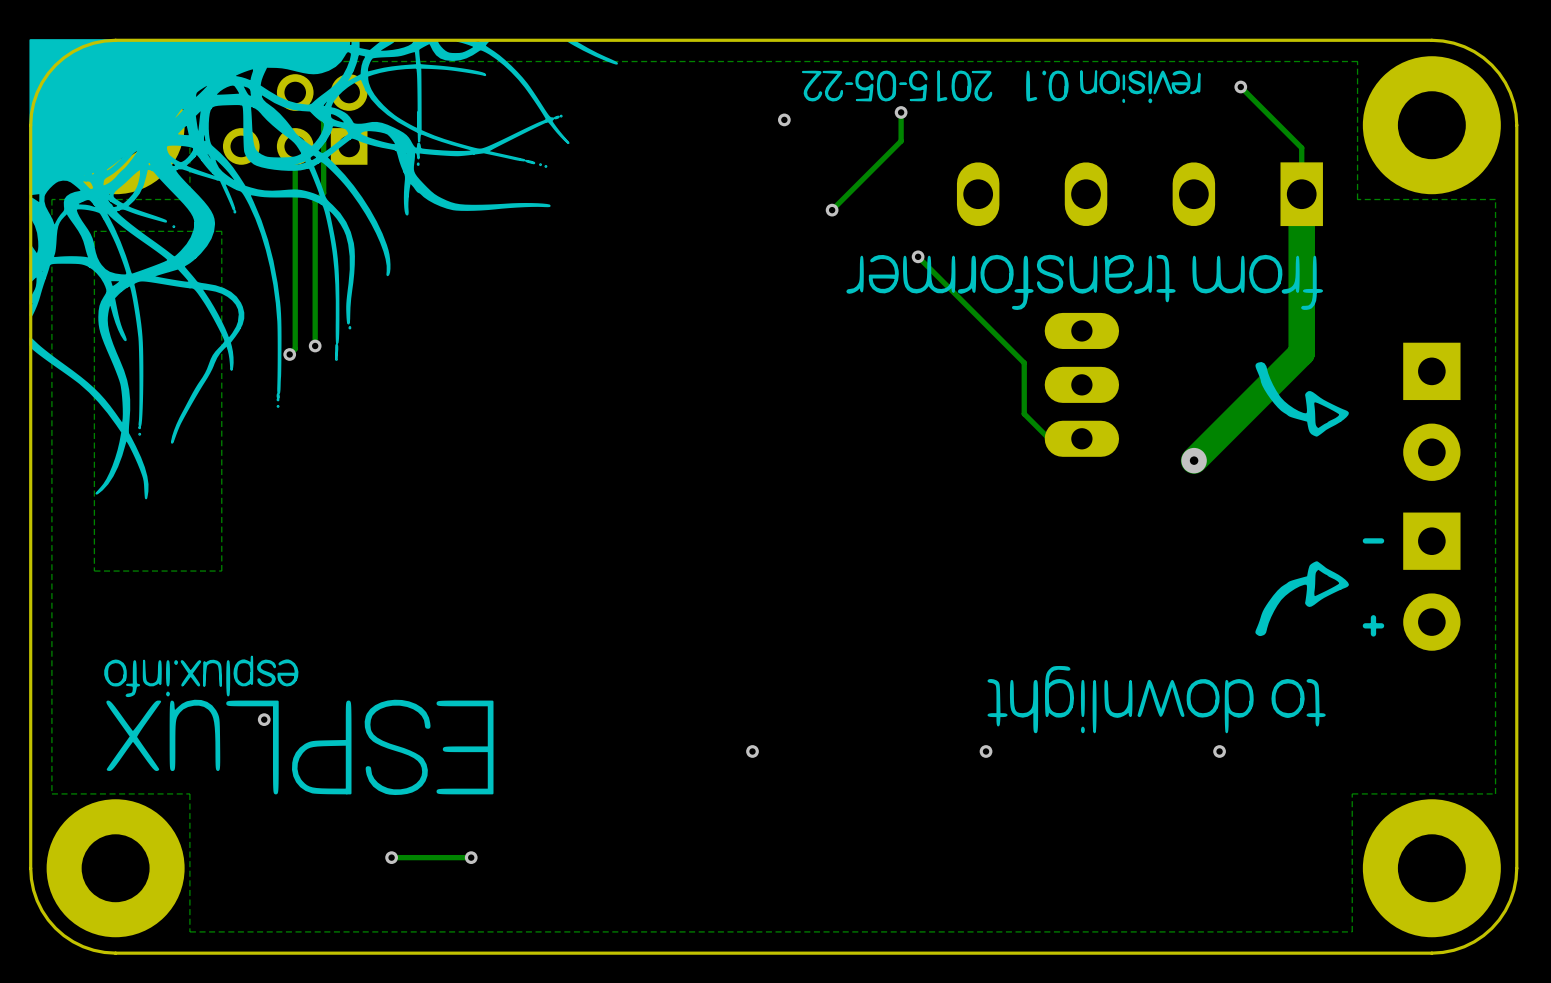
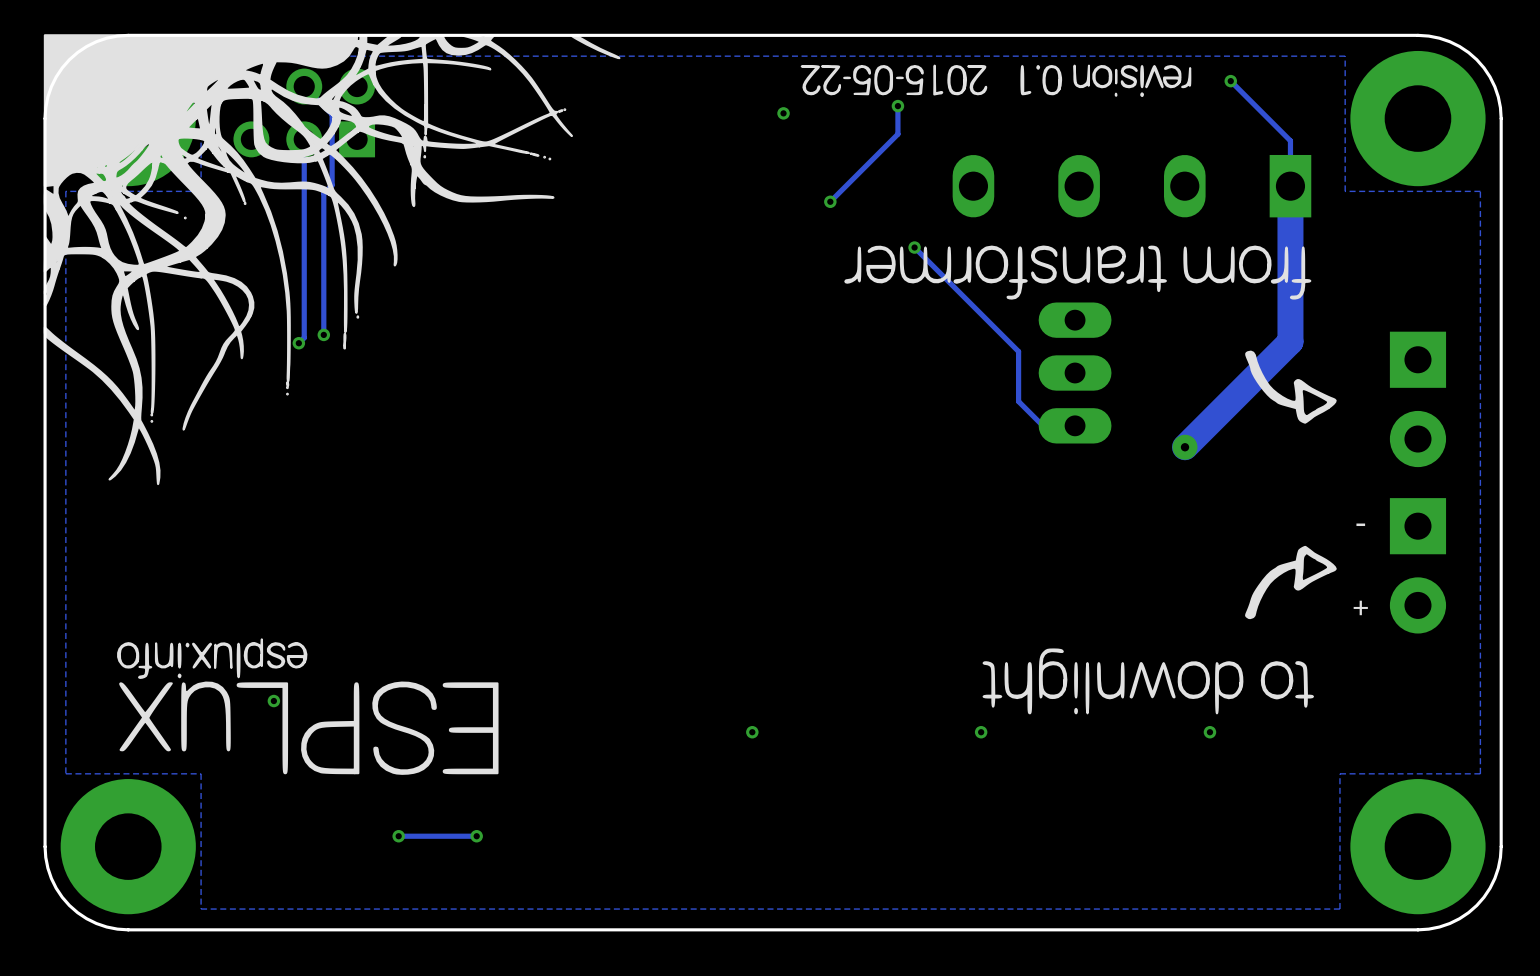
zone outline: (221, 231) (221, 571) (94, 571) (94, 231) (221, 231) -> none

